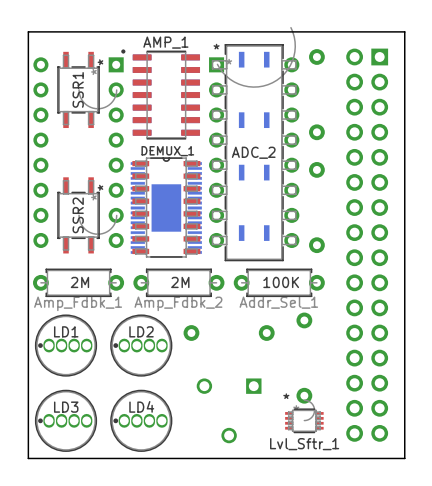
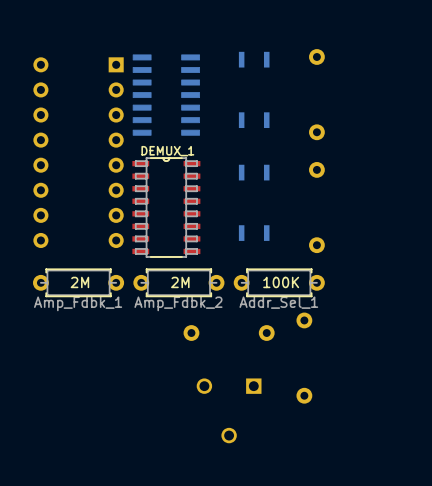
board edge: (28, 31) (404, 31) (404, 458) (28, 458) (28, 31) -> none
SSR1: (87, 89) -> none
AMP_1: (160, 94) -> none
ADC_2: (254, 144) -> none
part: (166, 207) -> none
SSR2: (87, 215) -> none
part: (367, 245) -> none
LD1: (66, 345) -> none
LD2: (141, 345) -> none
Lvl_Sftr_1: (304, 416) -> none
LD3: (66, 420) -> none
LD4: (141, 420) -> none

